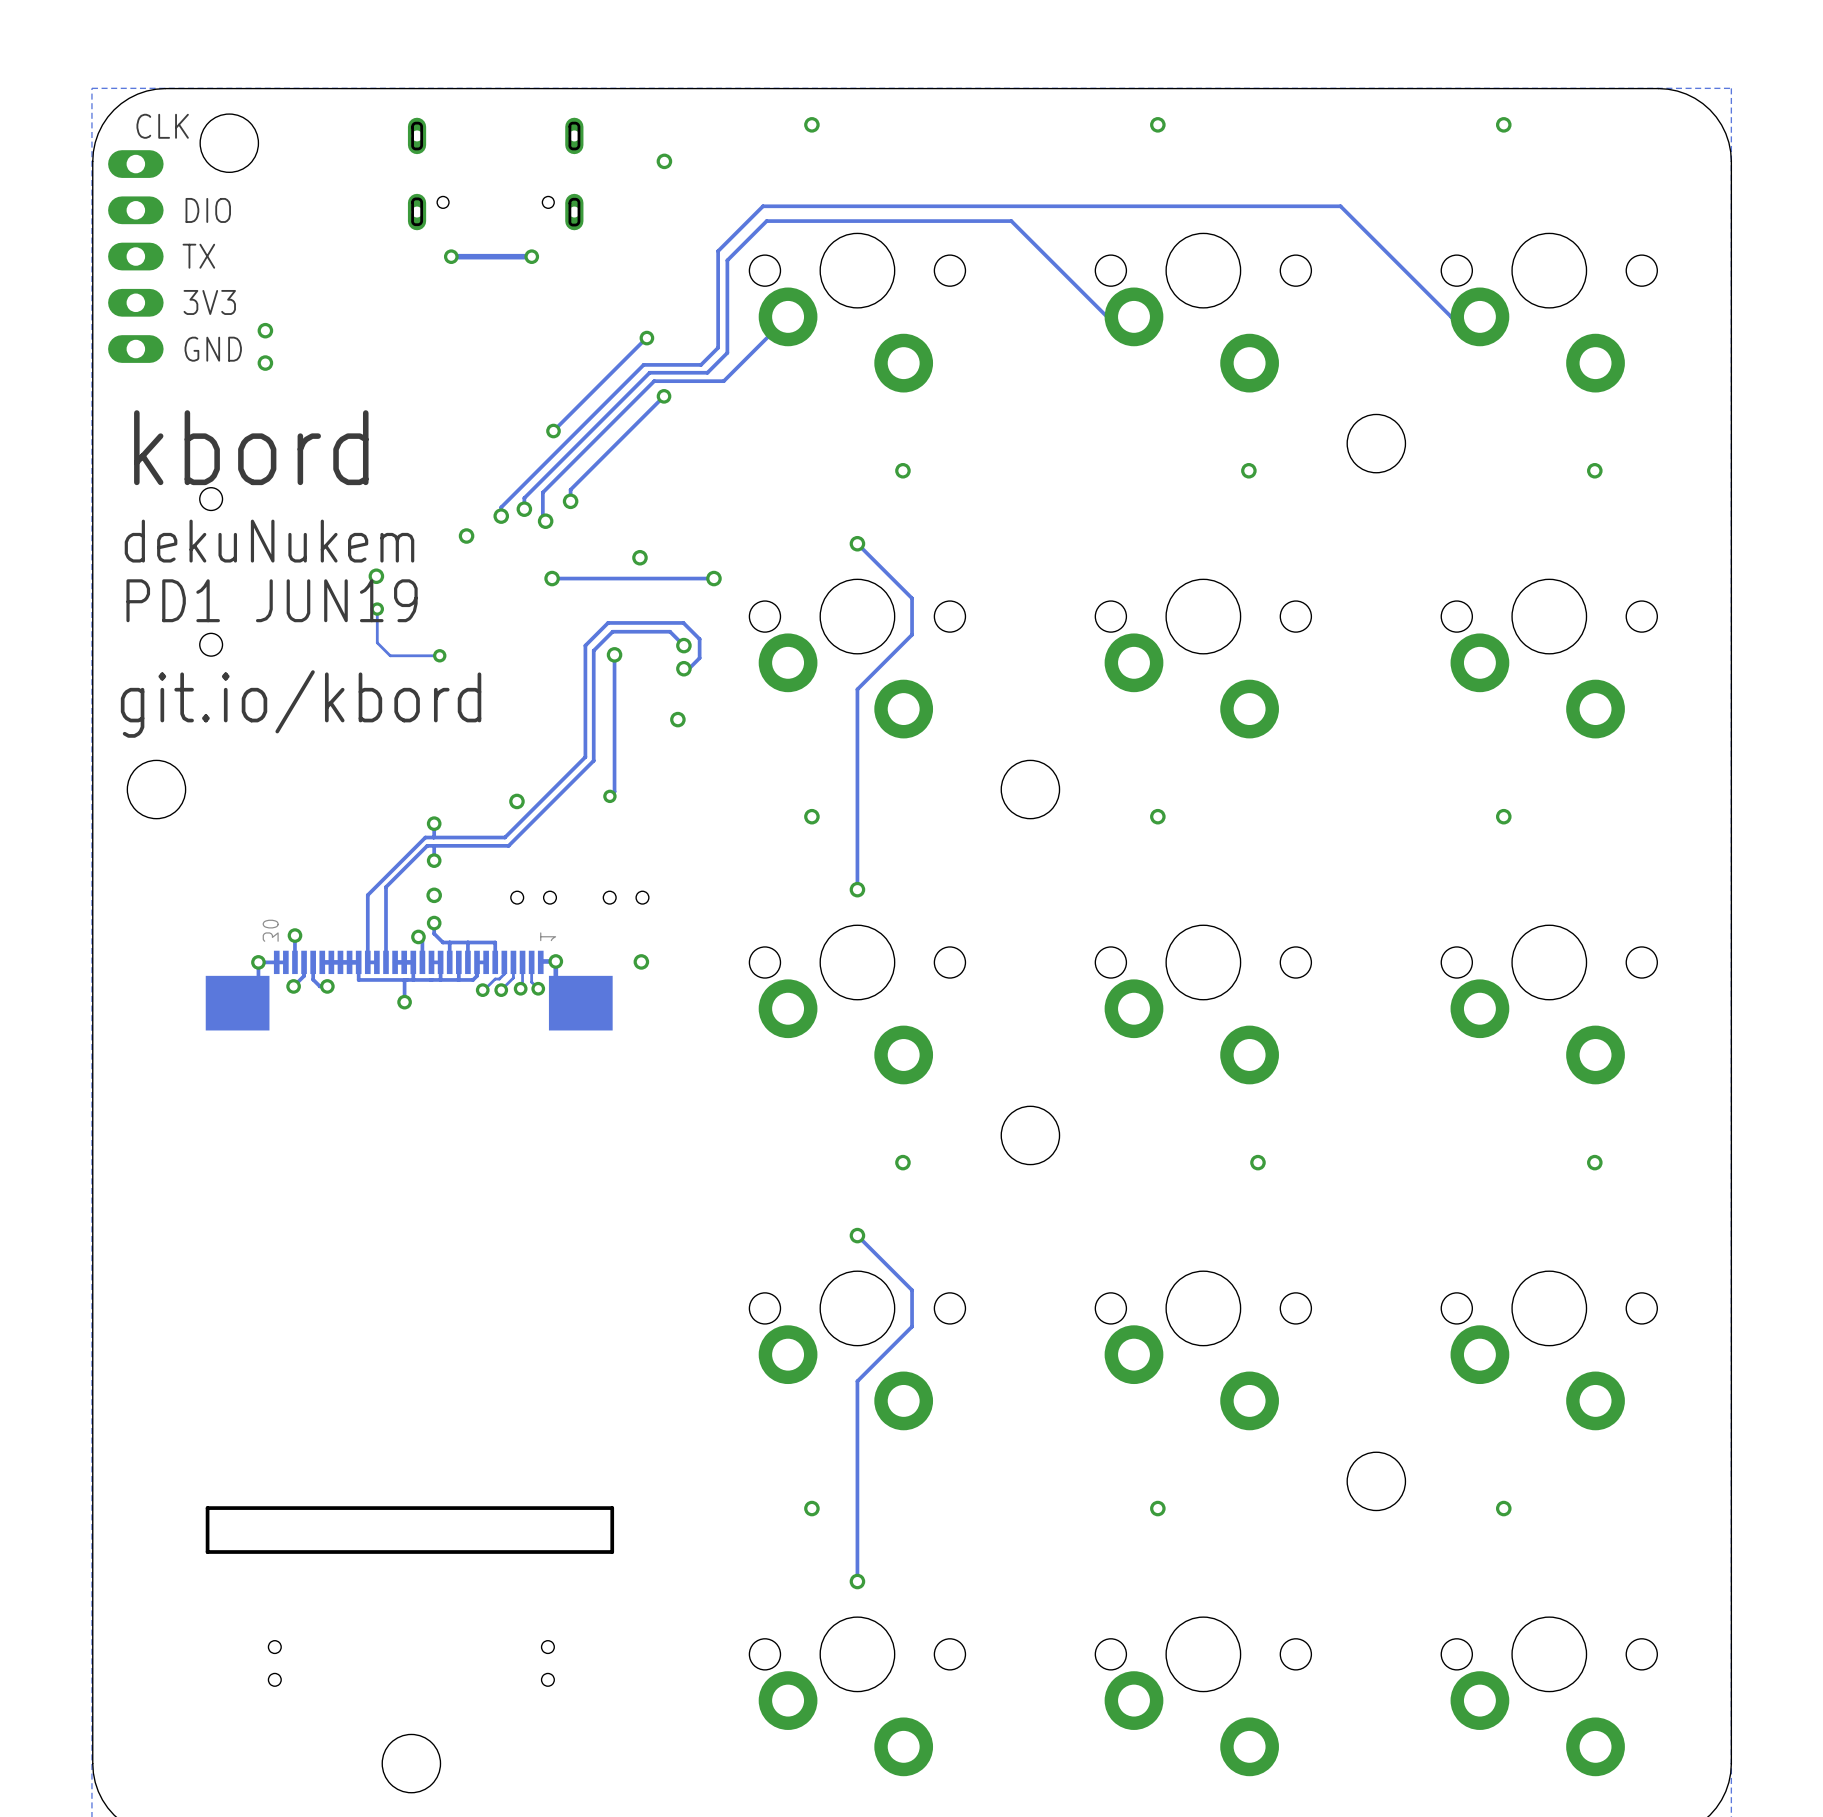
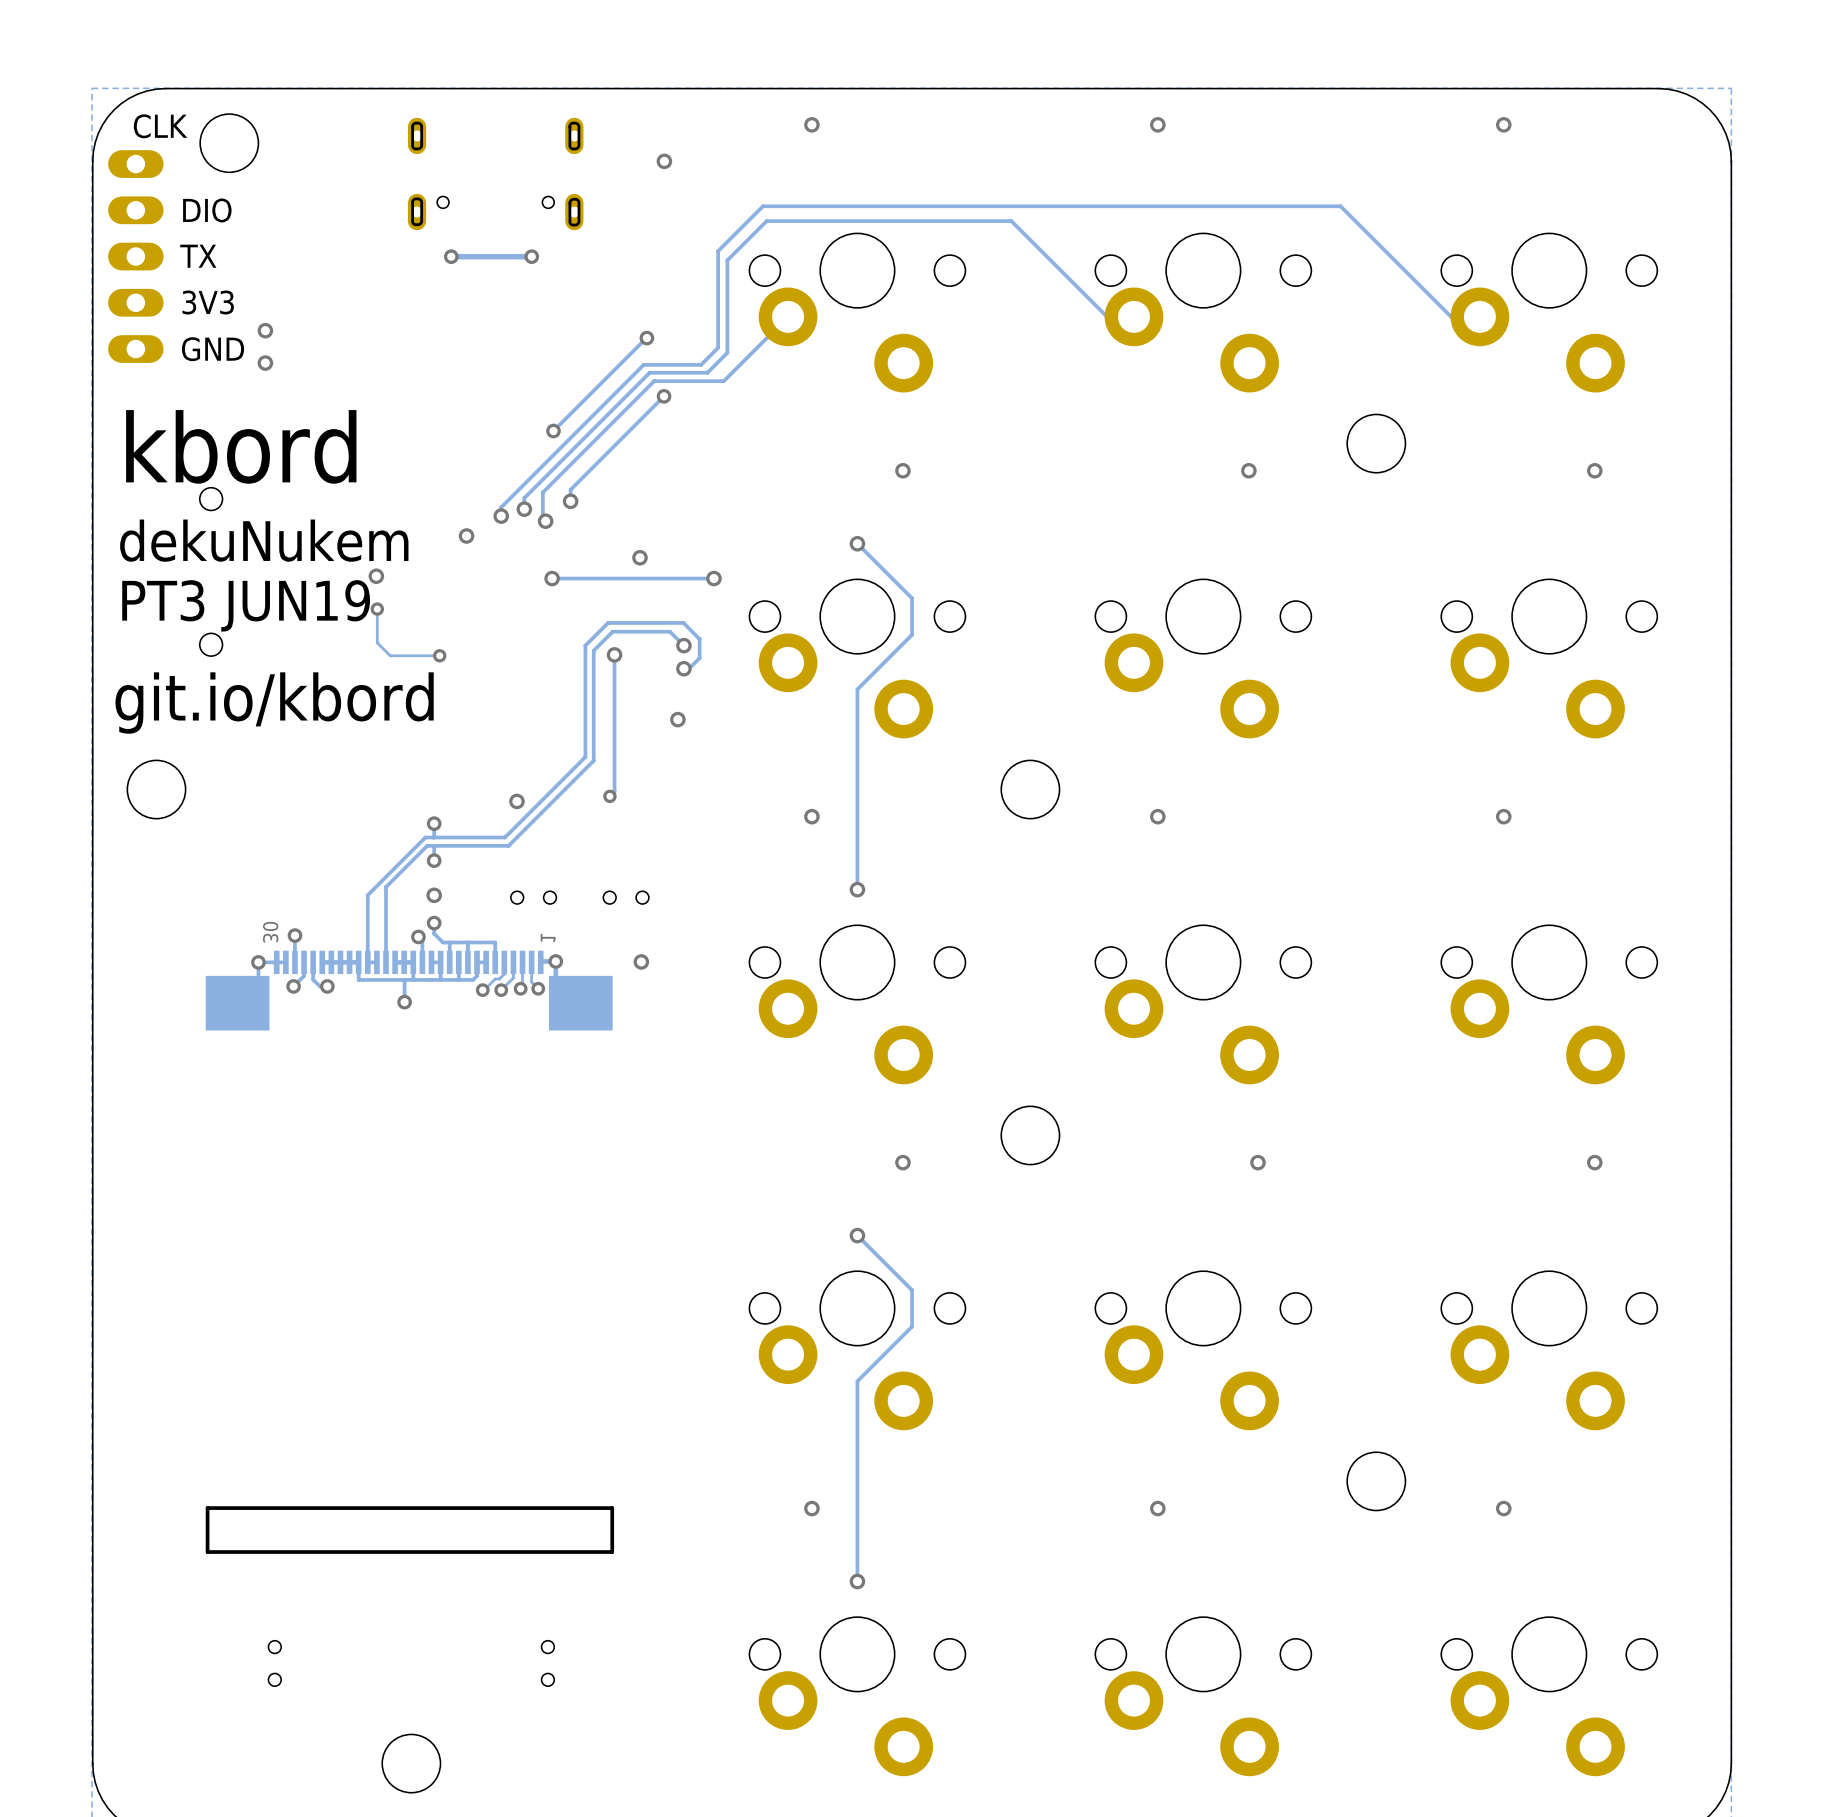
text: PD1 JUN19 (272, 600) -> PT3 JUN19 (246, 605)

